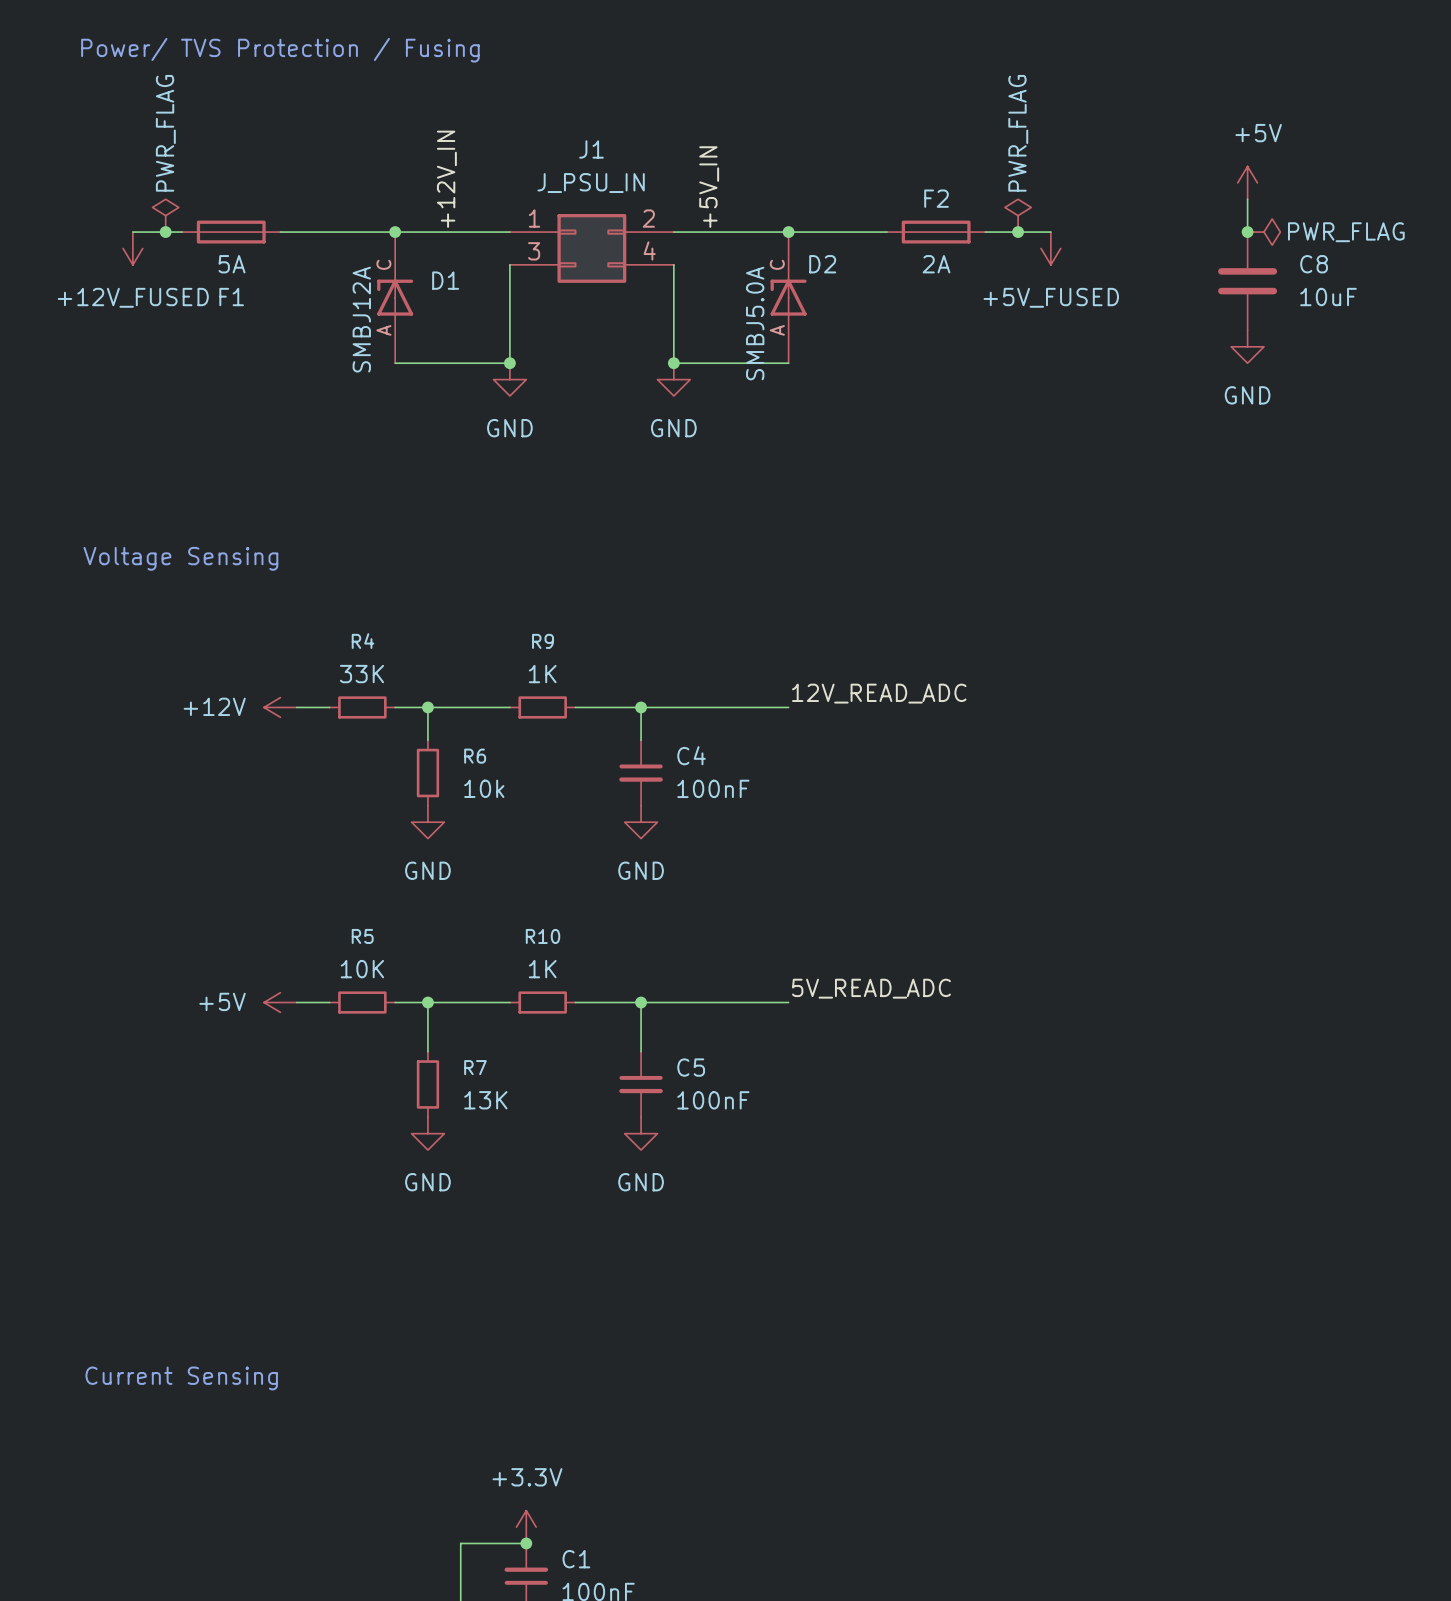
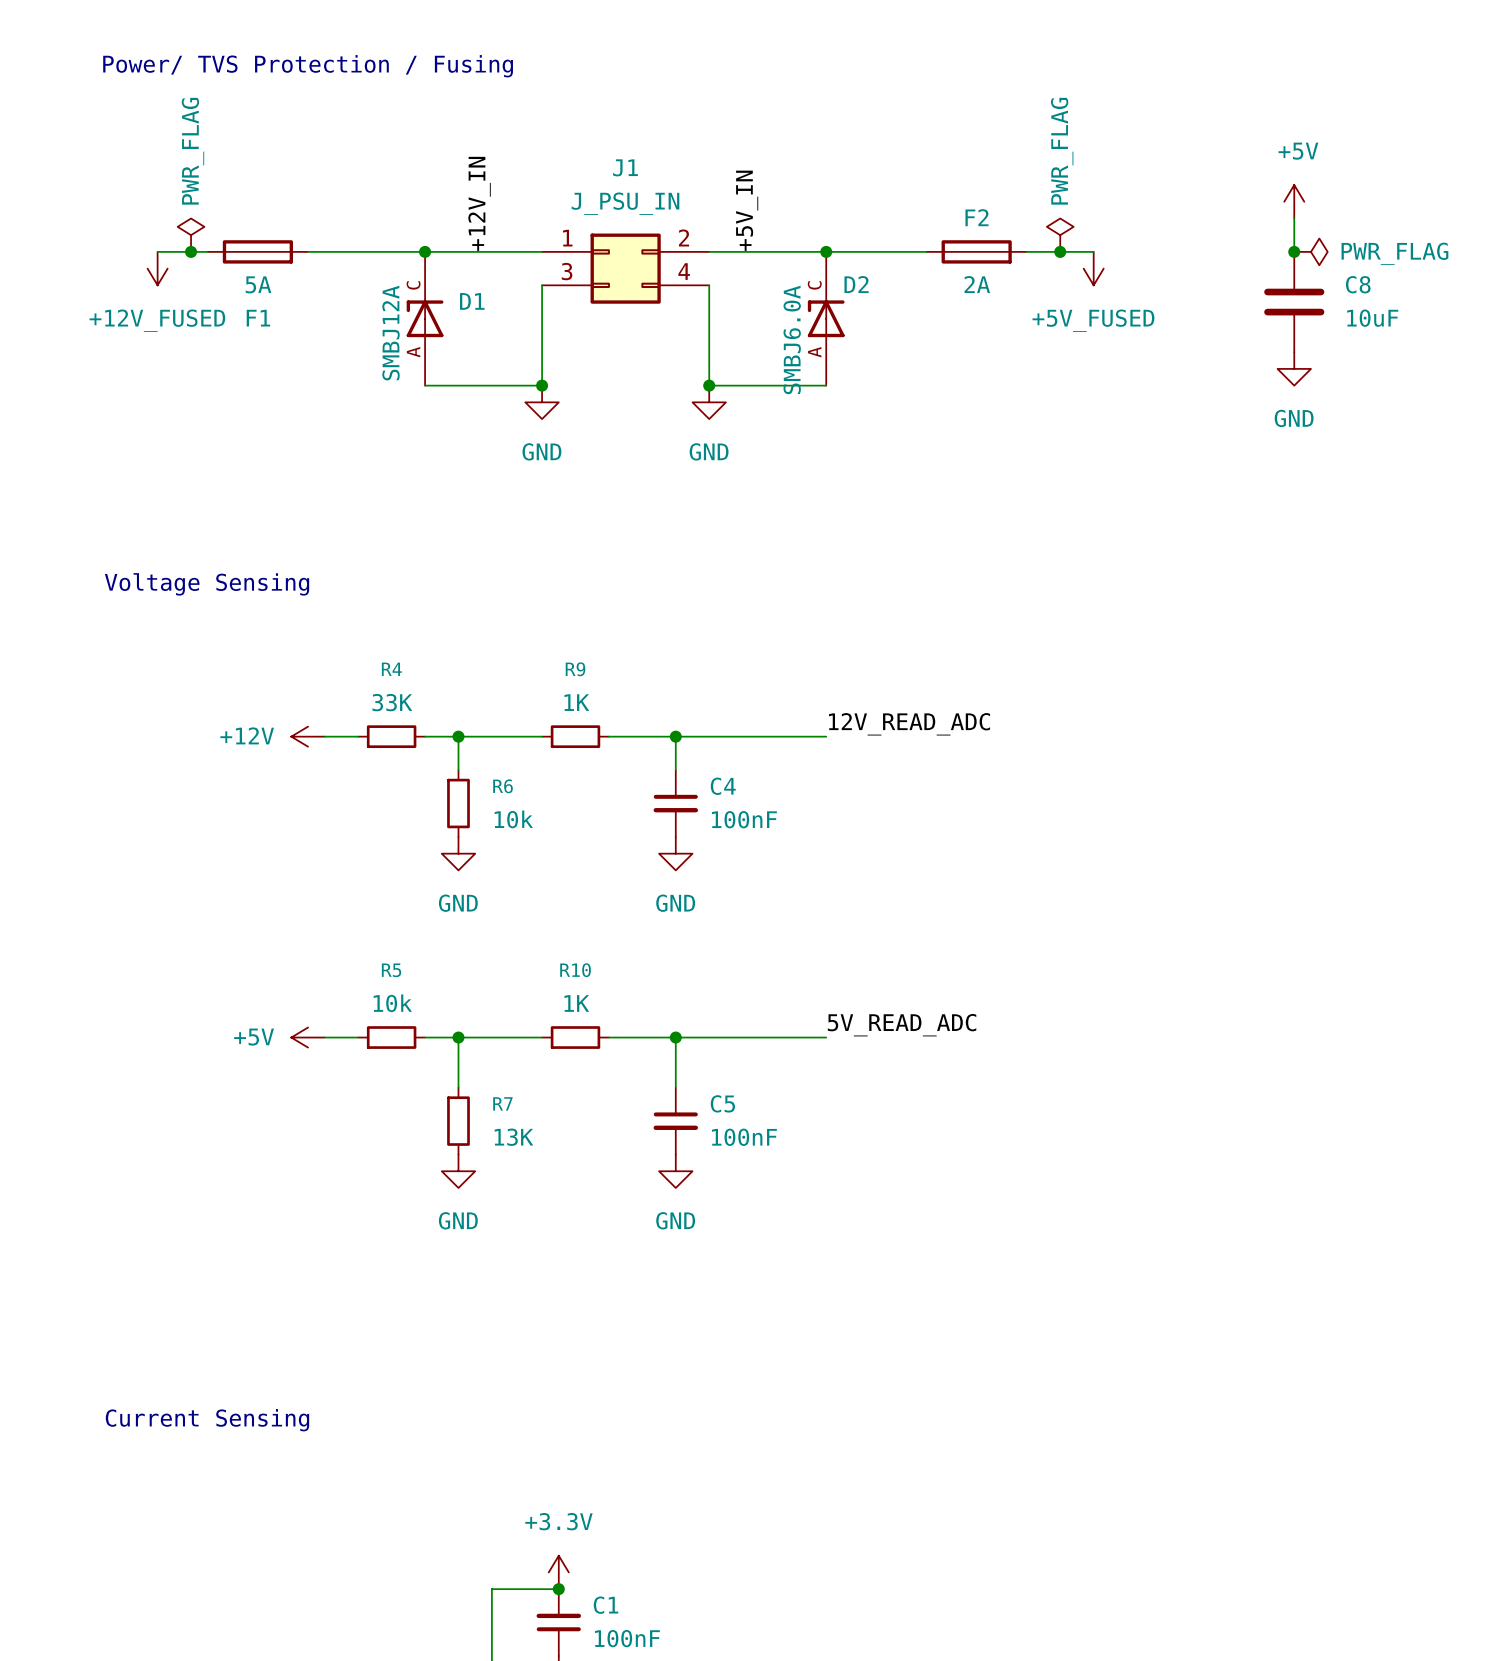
D2 value: SMBJ5.0A (755, 323) -> SMBJ6.0A (792, 339)
R5 value: 10K (362, 969) -> 10k (392, 1003)

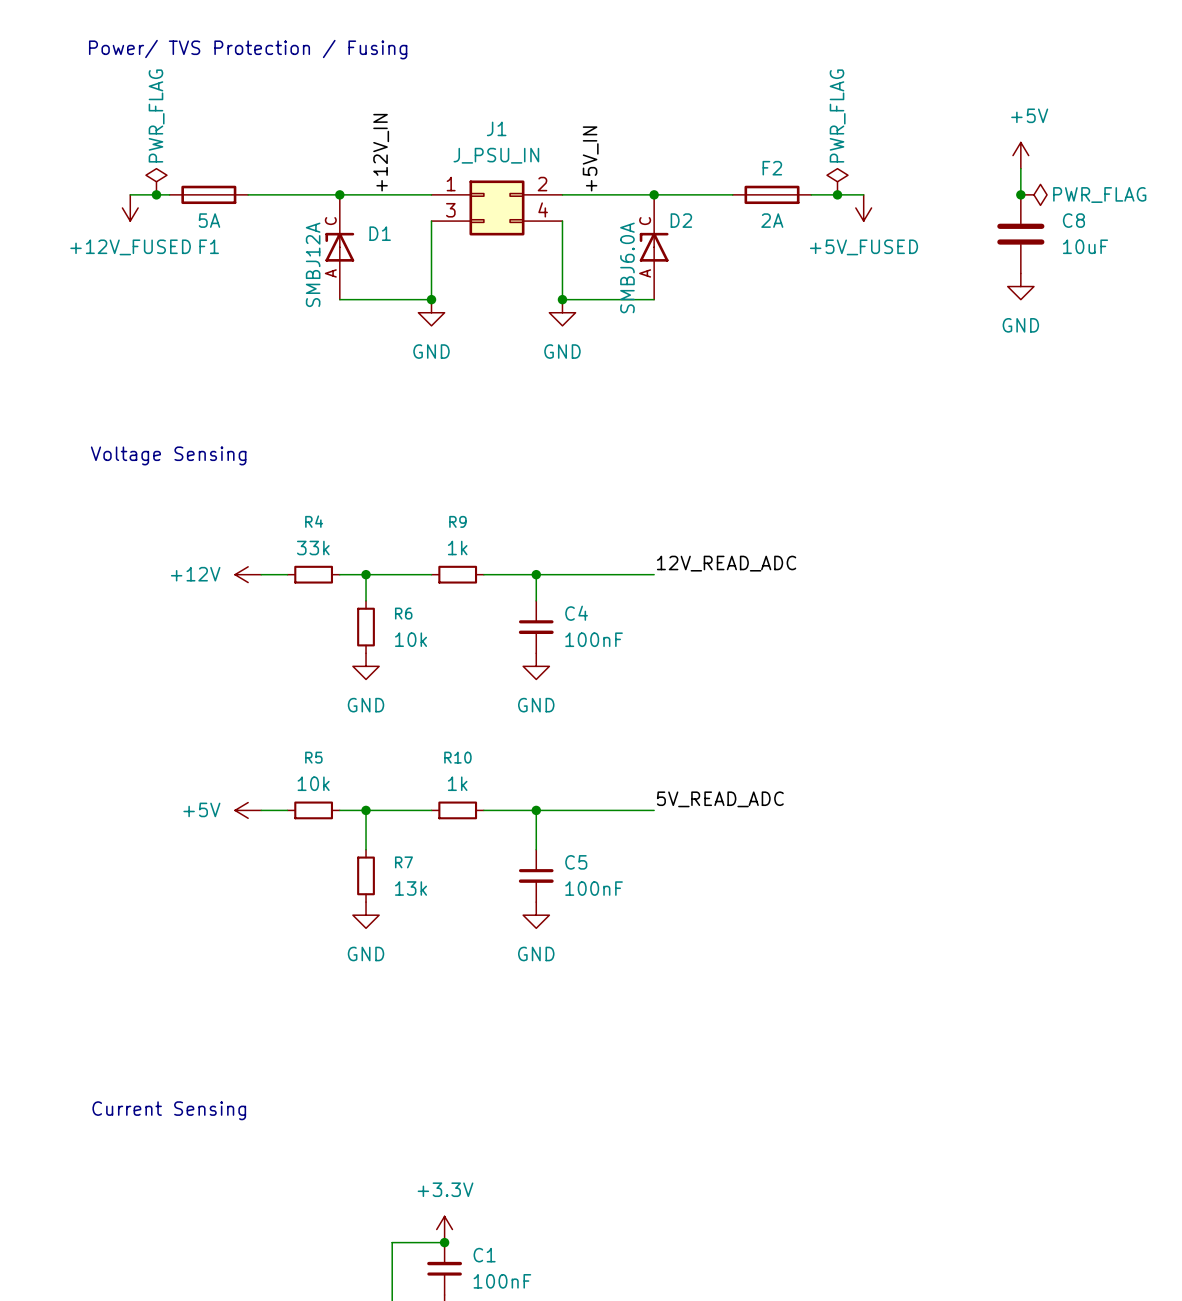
R4 value: 33K (392, 702) -> 33k (313, 547)
R9 value: 1K (576, 702) -> 1k (457, 547)
R10 value: 1K (576, 1003) -> 1k (457, 783)
R7 value: 13K (513, 1137) -> 13k (411, 888)

